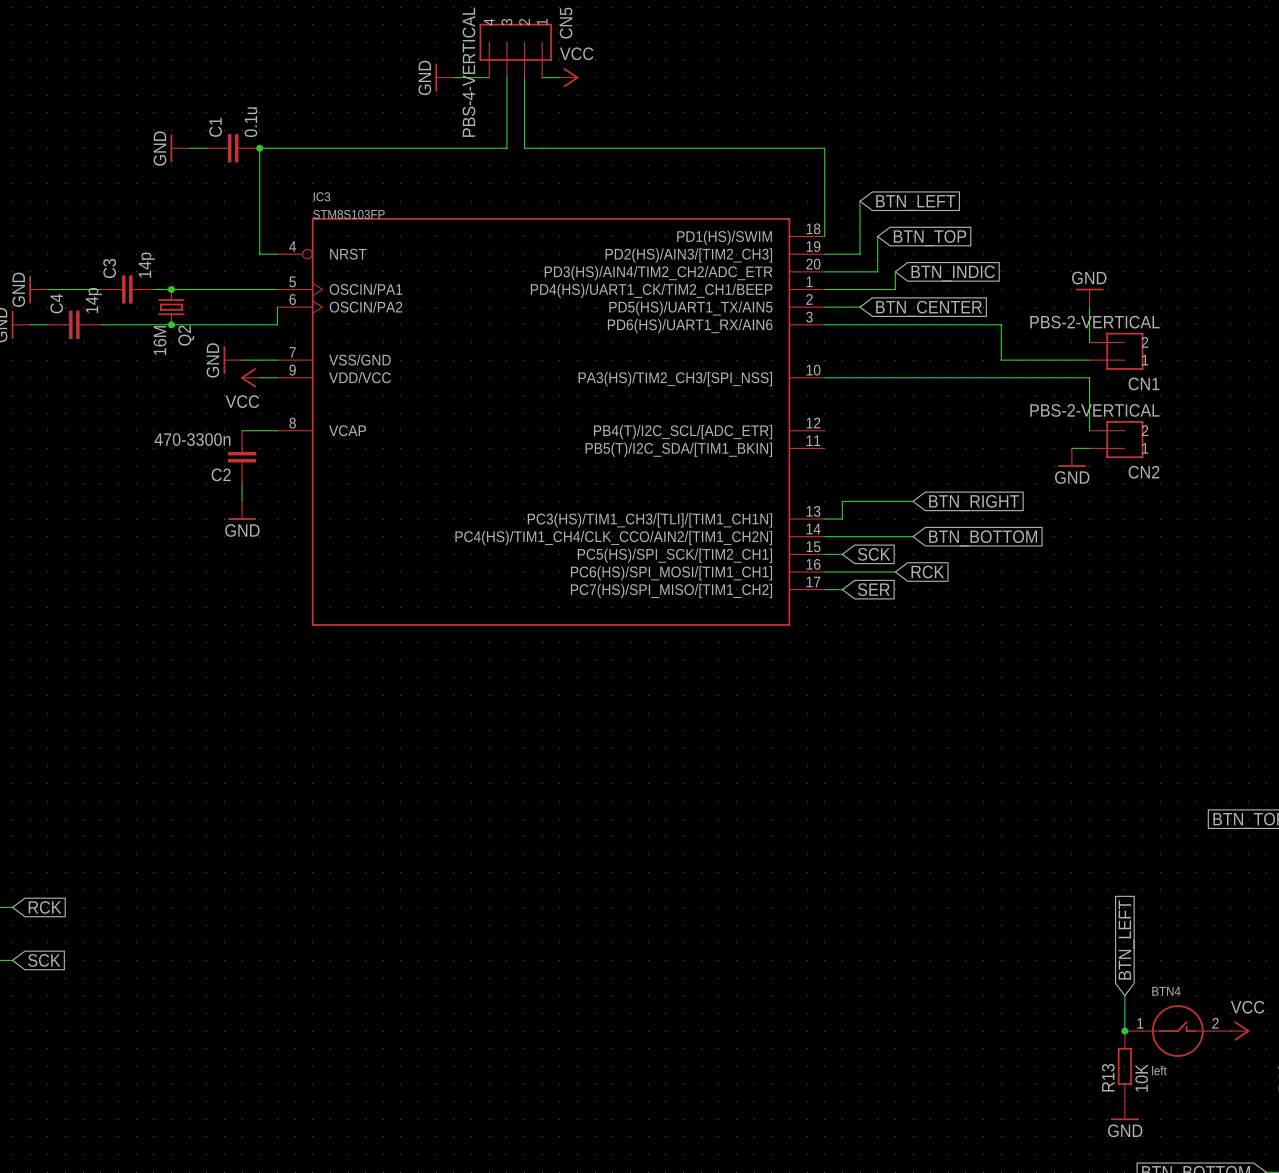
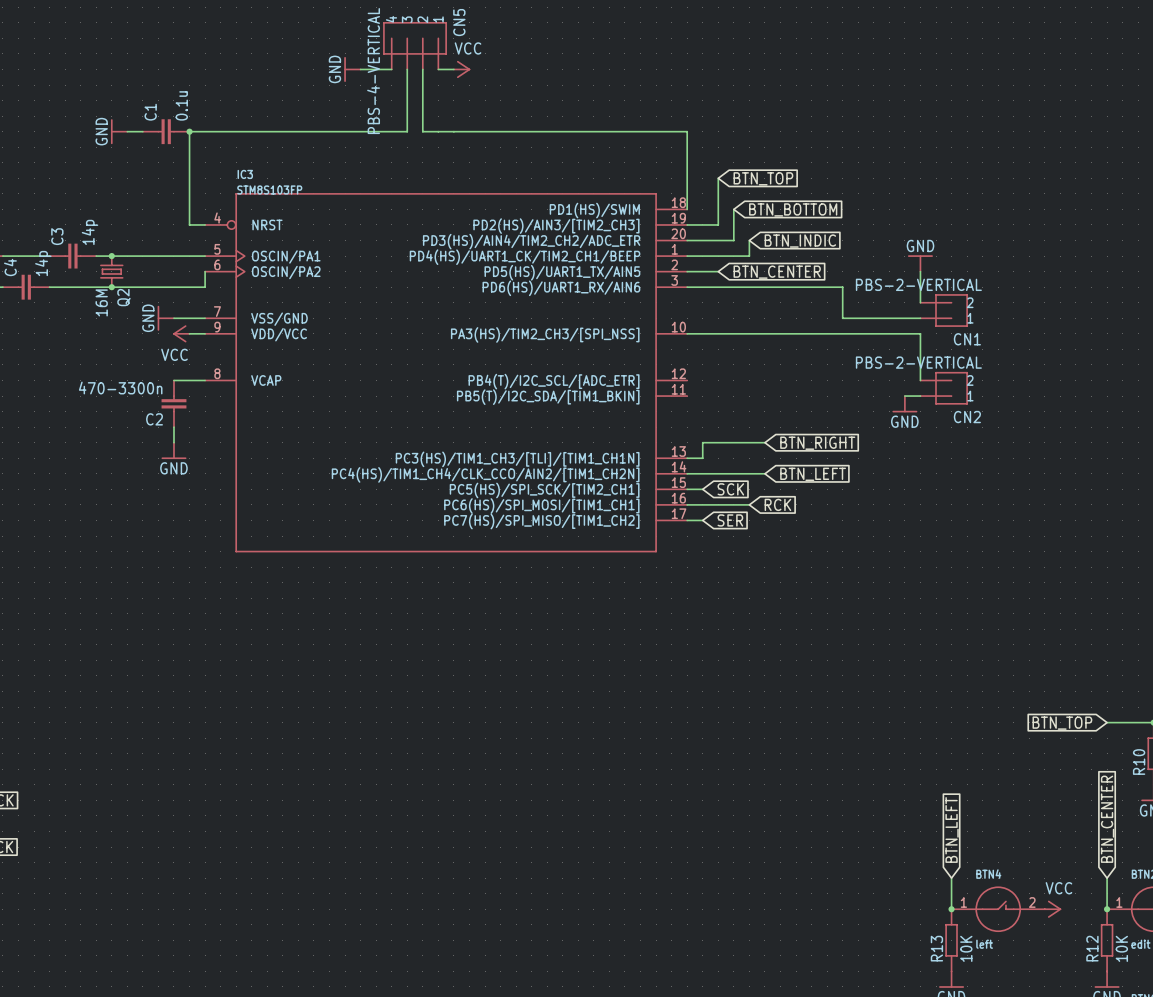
global label: BTN_LEFT (915, 203) -> BTN_TOP (763, 178)
global label: BTN_TOP (930, 238) -> BTN_BOTTOM (793, 209)
global label: BTN_BOTTOM (983, 538) -> BTN_LEFT (813, 474)

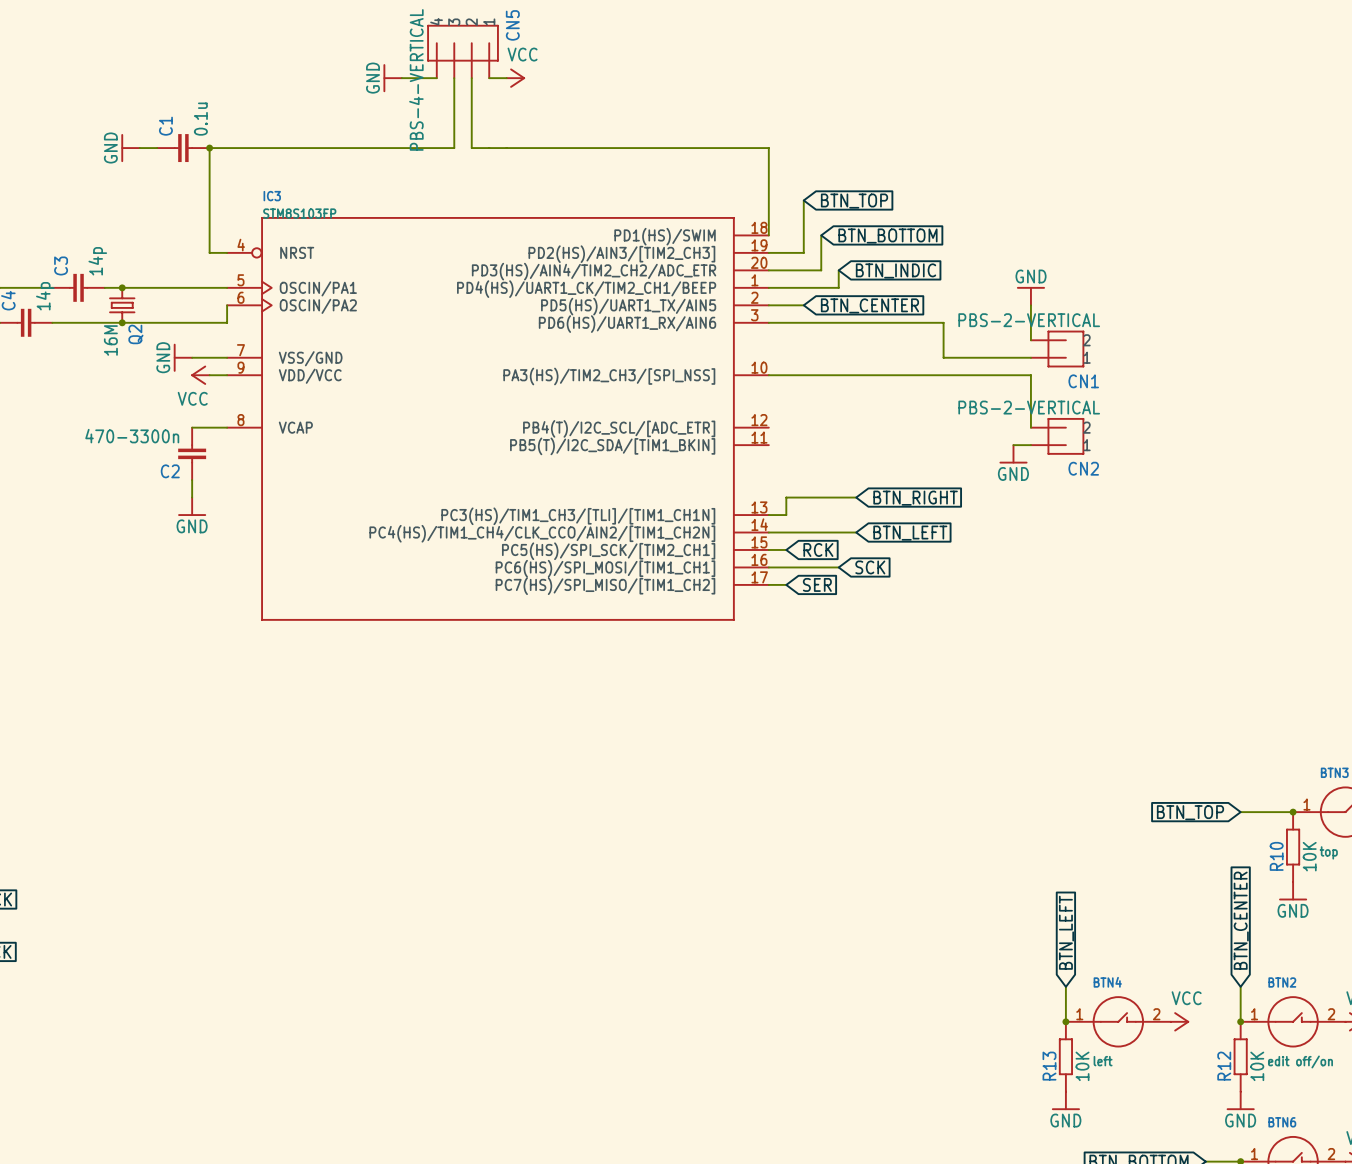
global label: SCK (730, 489) -> RCK (818, 549)
global label: RCK (777, 504) -> SCK (870, 567)

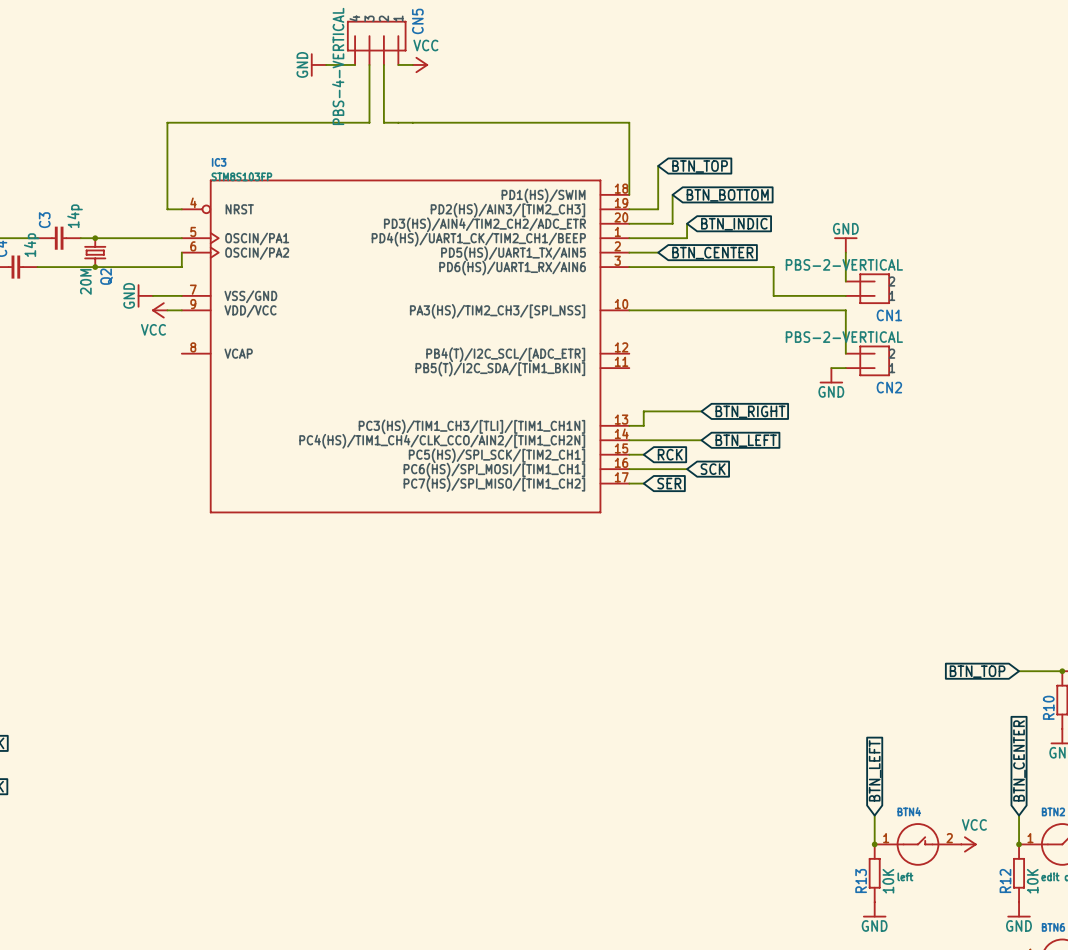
power symbol: GND (130, 148) -> none
wire: (139, 148) (157, 148) -> none
C1: 0.1u (183, 148) -> none
junction: (209, 148) -> none
Q2 value: 16M (110, 340) -> 20M (85, 281)
wire: (192, 427) (227, 427) -> none
C2: 470-3300n (192, 453) -> none
wire: (192, 480) (192, 497) -> none
power symbol: GND (192, 506) -> none

